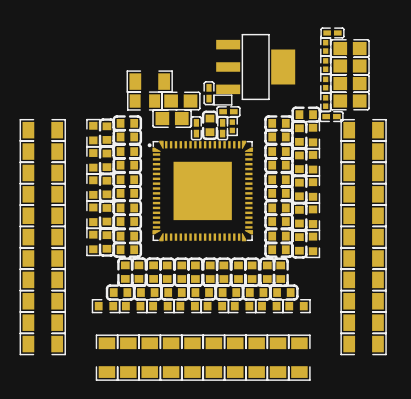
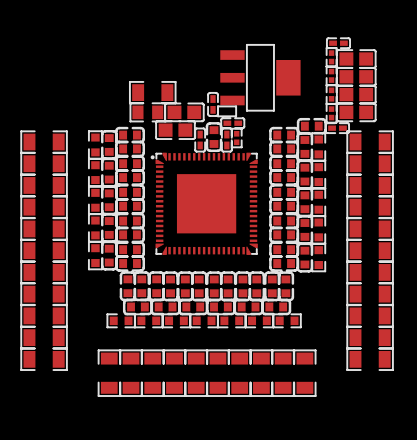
part: (120, 292) -> none
part: none -> (137, 306)
part: (147, 292) -> none
part: none -> (165, 306)
part: (174, 292) -> none
part: none -> (193, 306)
part: (202, 292) -> none
part: none -> (220, 306)
part: (229, 292) -> none
part: none -> (248, 306)
part: (256, 292) -> none
part: none -> (276, 306)
part: (283, 292) -> none
part: (105, 306) -> none
part: none -> (121, 320)
part: (133, 306) -> none
part: none -> (148, 320)
part: (160, 306) -> none
part: none -> (176, 320)
part: (187, 306) -> none
part: none -> (204, 320)
part: (214, 306) -> none
part: none -> (231, 320)
part: (242, 306) -> none
part: none -> (259, 320)
part: (269, 306) -> none
part: none -> (287, 320)
part: (296, 306) -> none

